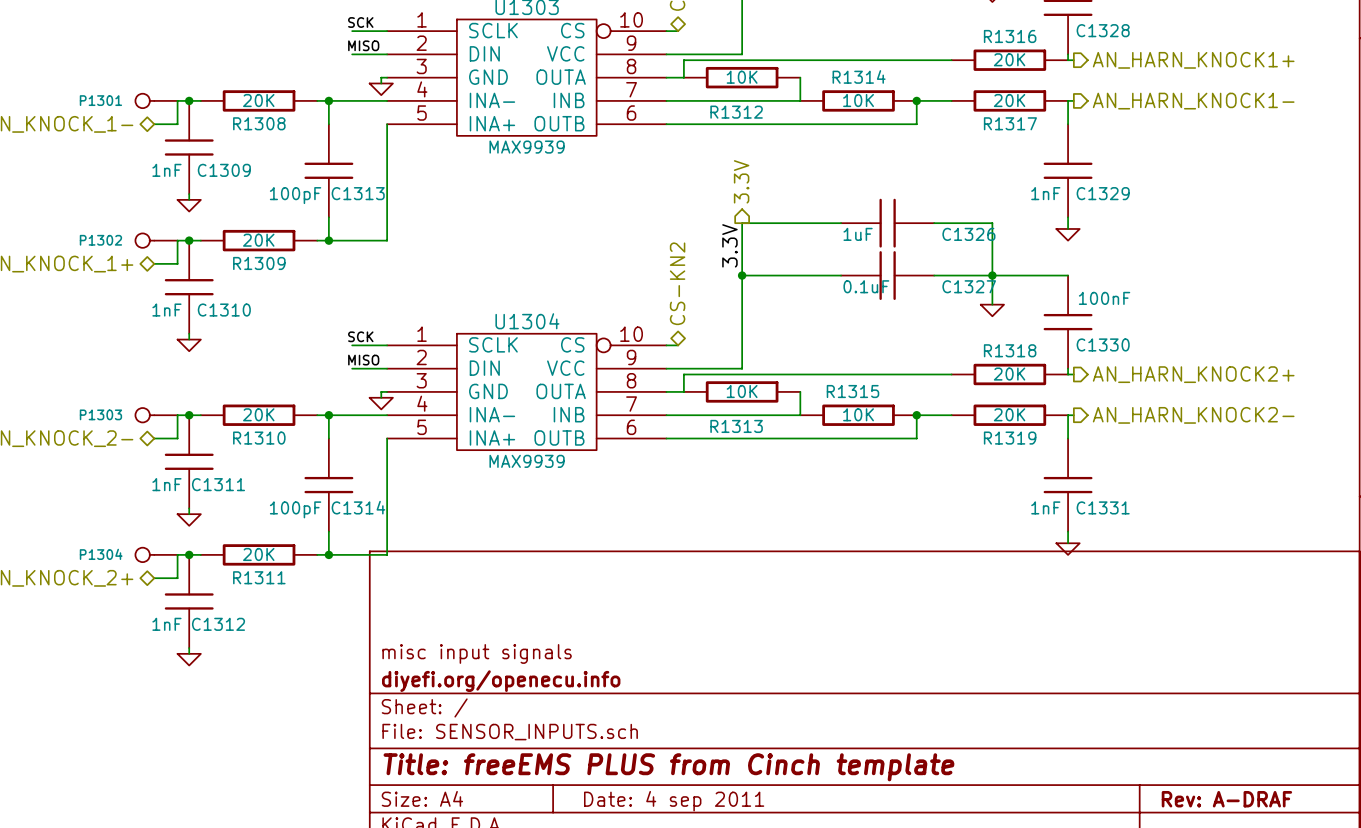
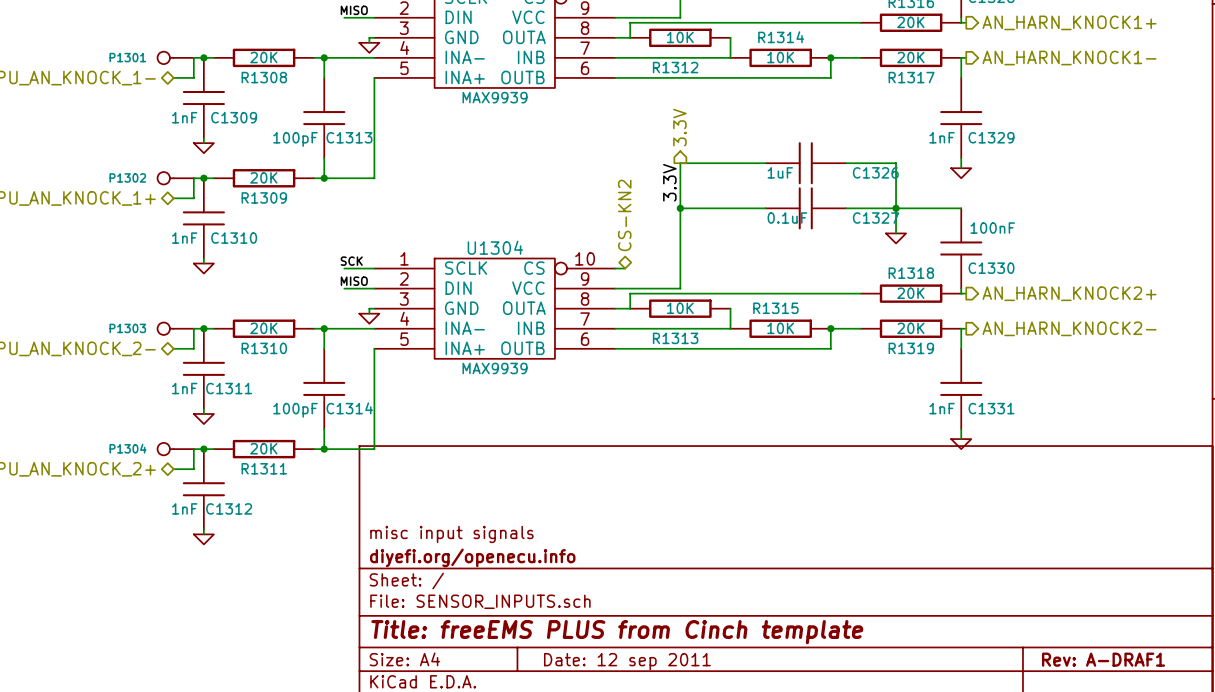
title block: Rev: A-DRAF (1226, 799) -> Rev: A-DRAF1 (1103, 659)
title block: Date: 4 sep 2011 (674, 801) -> Date: 12 sep 2011 (627, 661)

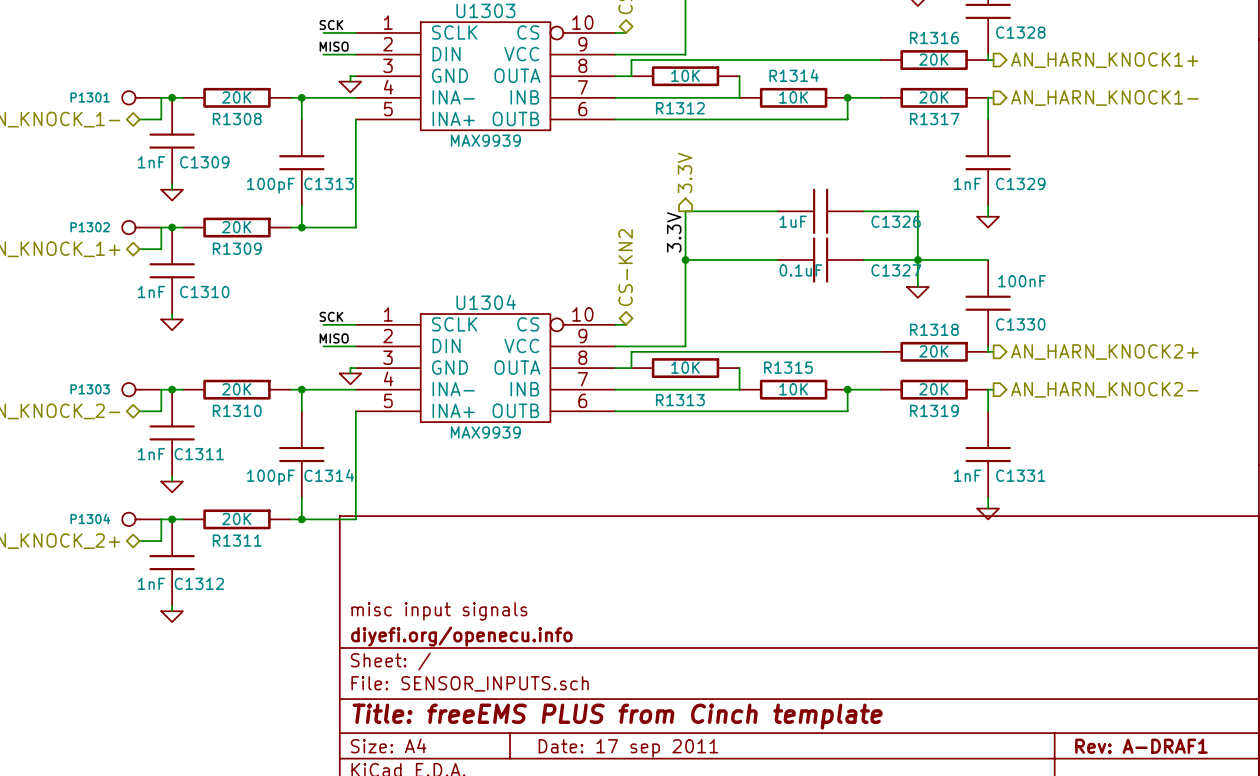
title block: Date: 12 sep 2011 (627, 661) -> Date: 17 sep 2011 (628, 748)

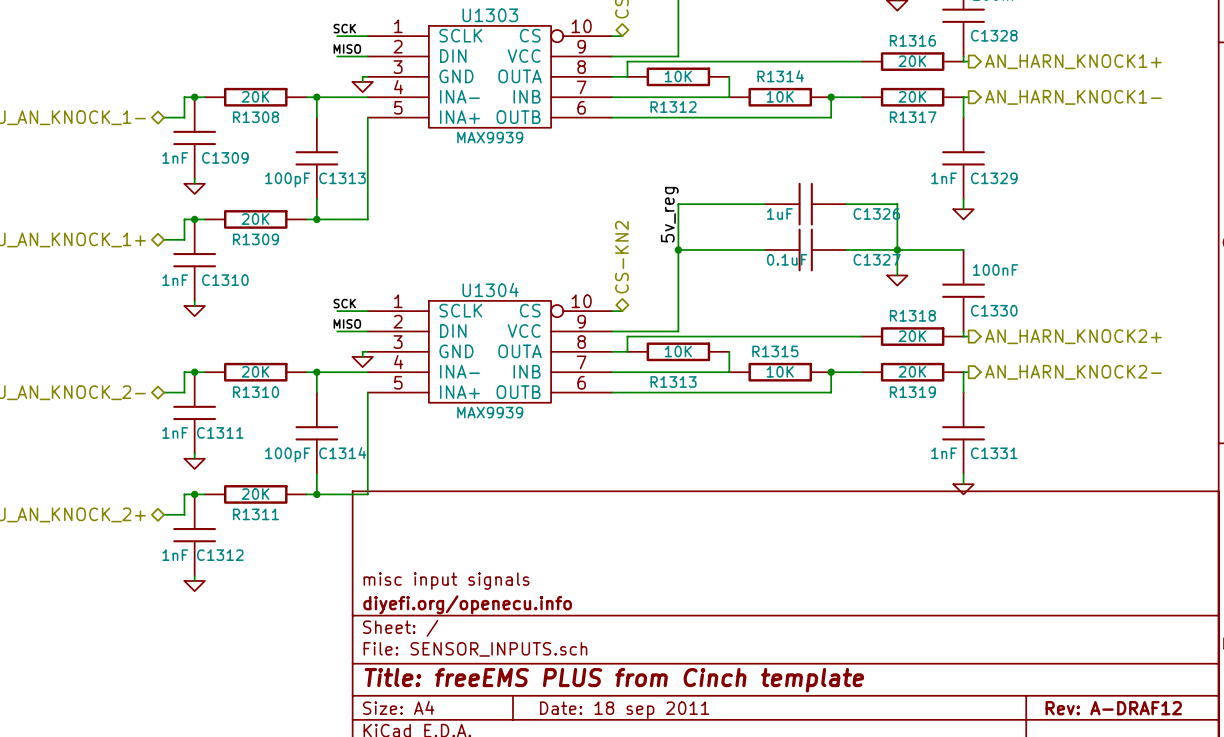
P1301: (141, 97) -> none
hierarchical label: 3.3V (685, 172) -> none
P1302: (141, 227) -> none
label: 3.3V (674, 232) -> 5v_reg (669, 214)
P1303: (141, 389) -> none
P1304: (141, 519) -> none
title block: Rev: A-DRAF1 (1141, 746) -> Rev: A-DRAF12 (1113, 708)
title block: Date: 17 sep 2011 (628, 748) -> Date: 18 sep 2011 (624, 710)

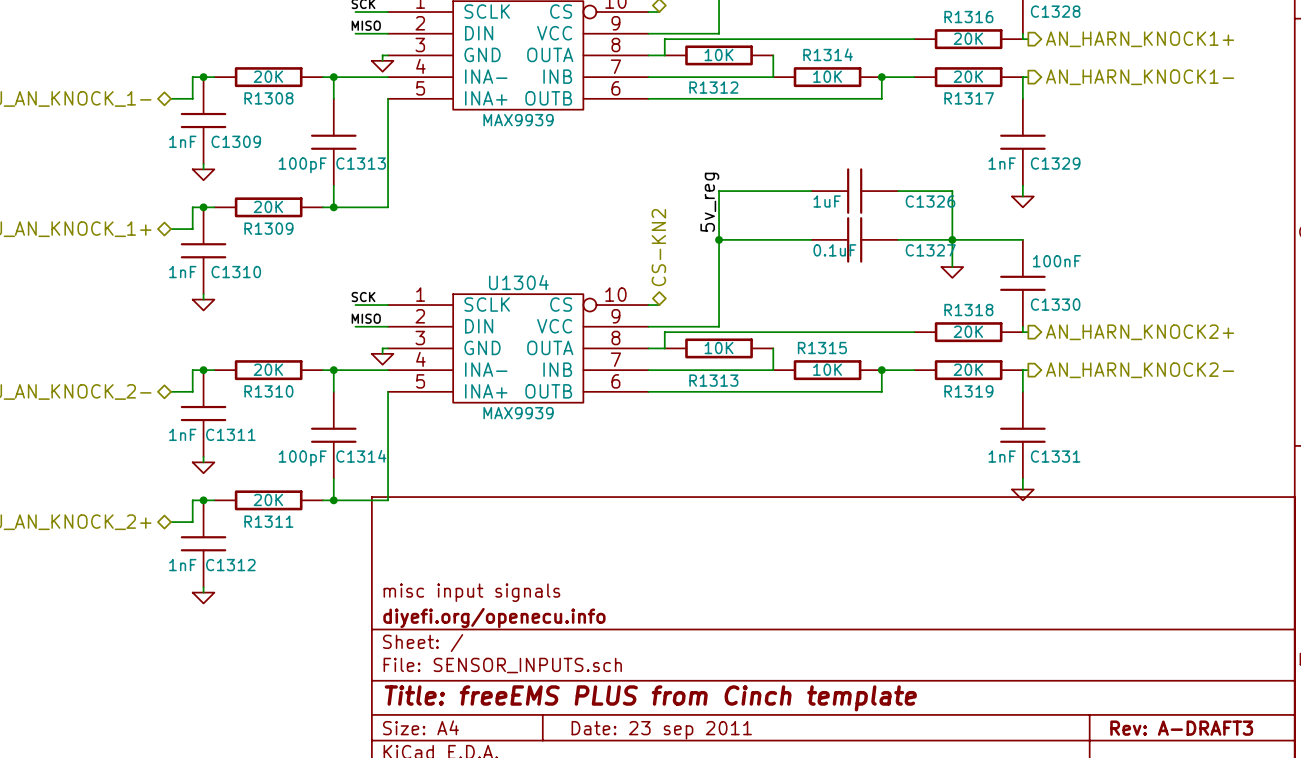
title block: Rev: A-DRAF12 (1113, 708) -> Rev: A-DRAFT3 (1181, 728)
title block: Date: 18 sep 2011 (624, 710) -> Date: 23 sep 2011 (661, 730)

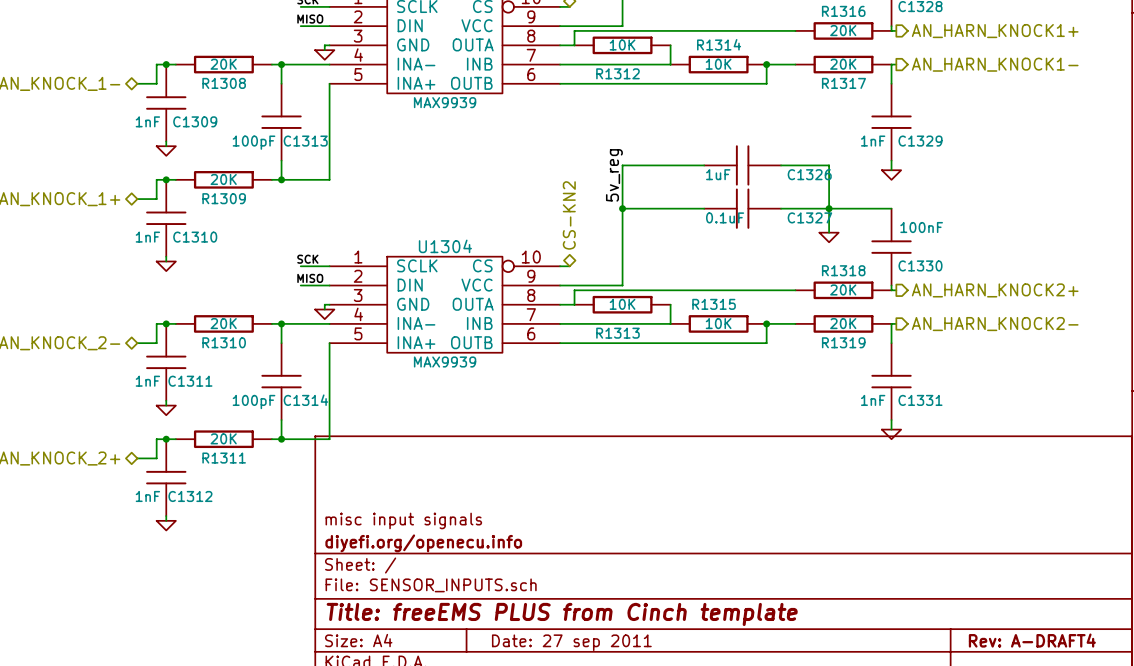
title block: Rev: A-DRAFT3 (1181, 728) -> Rev: A-DRAFT4 (1032, 640)
title block: Date: 23 sep 2011 (661, 730) -> Date: 27 sep 2011 (571, 642)

